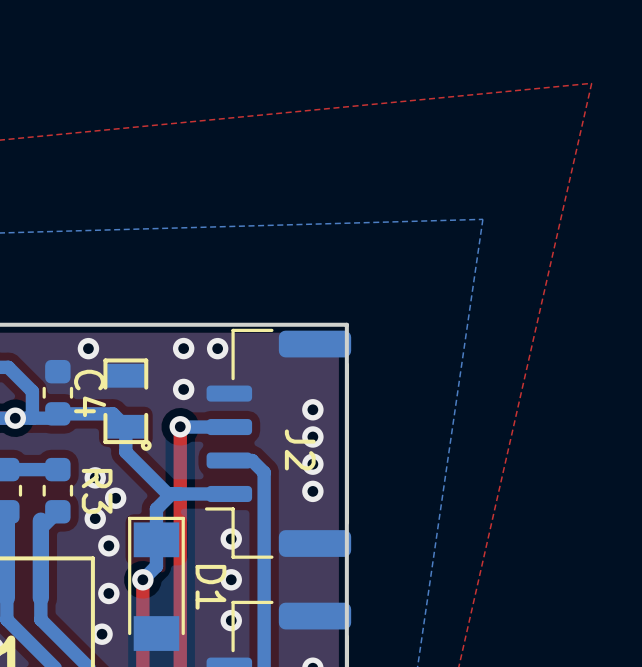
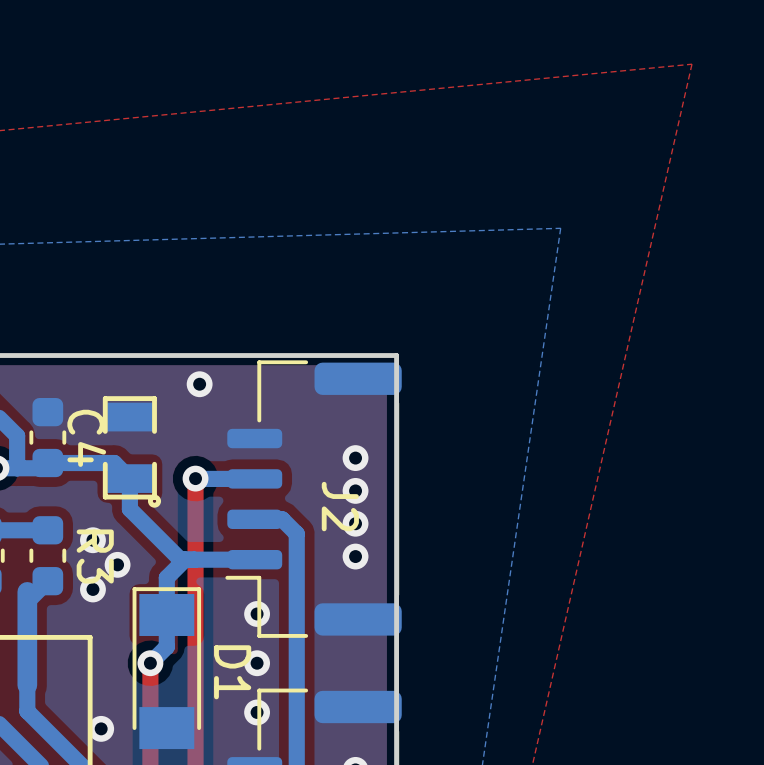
via: (88, 348) -> none
via: (217, 348) -> none
via: (183, 389) -> none
via: (108, 545) -> none
via: (108, 593) -> none

